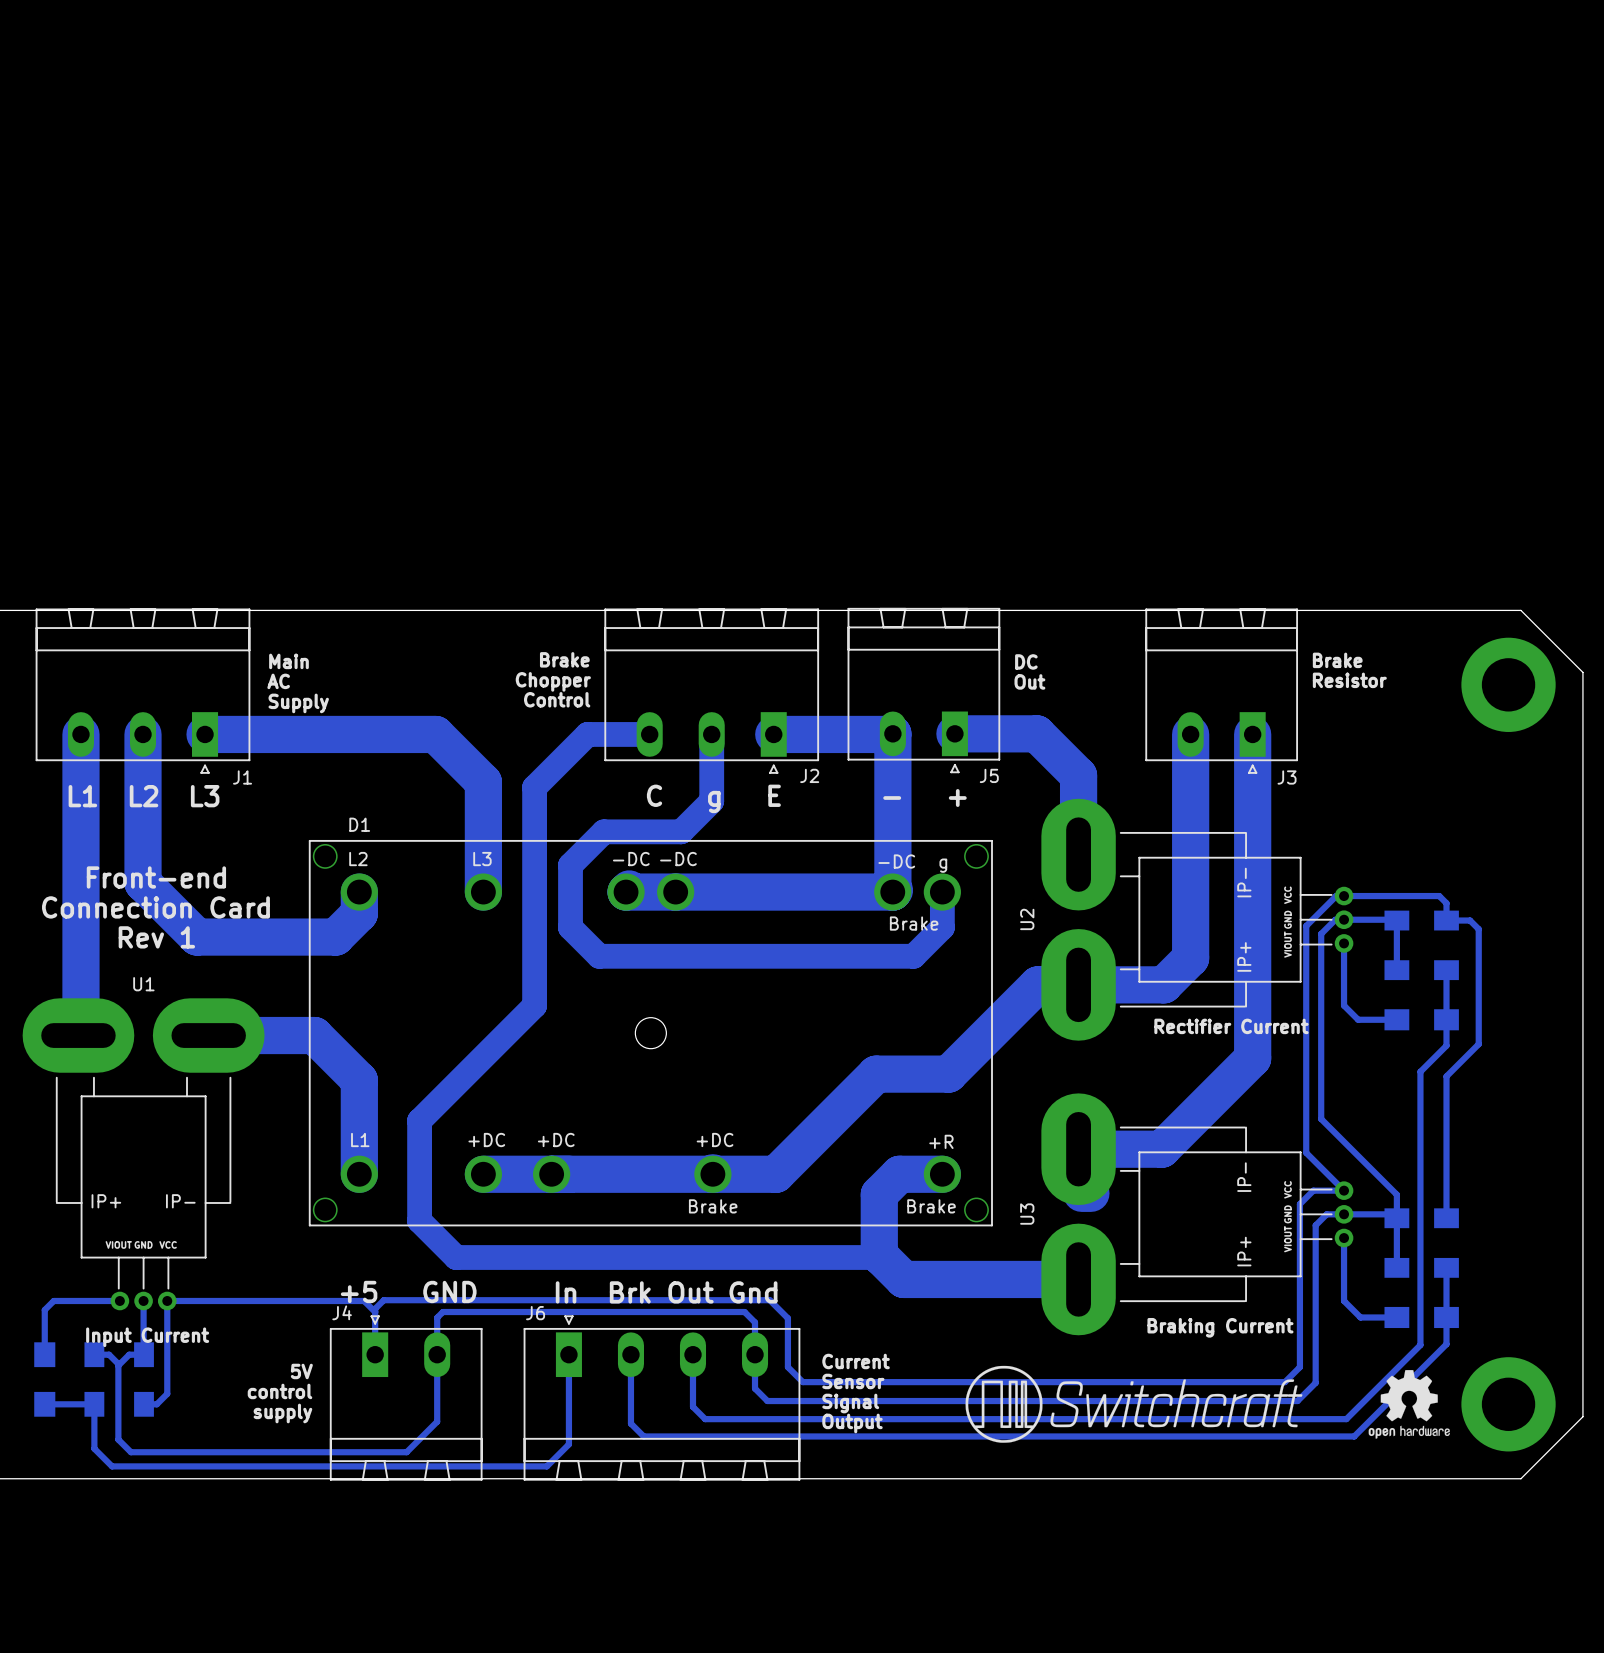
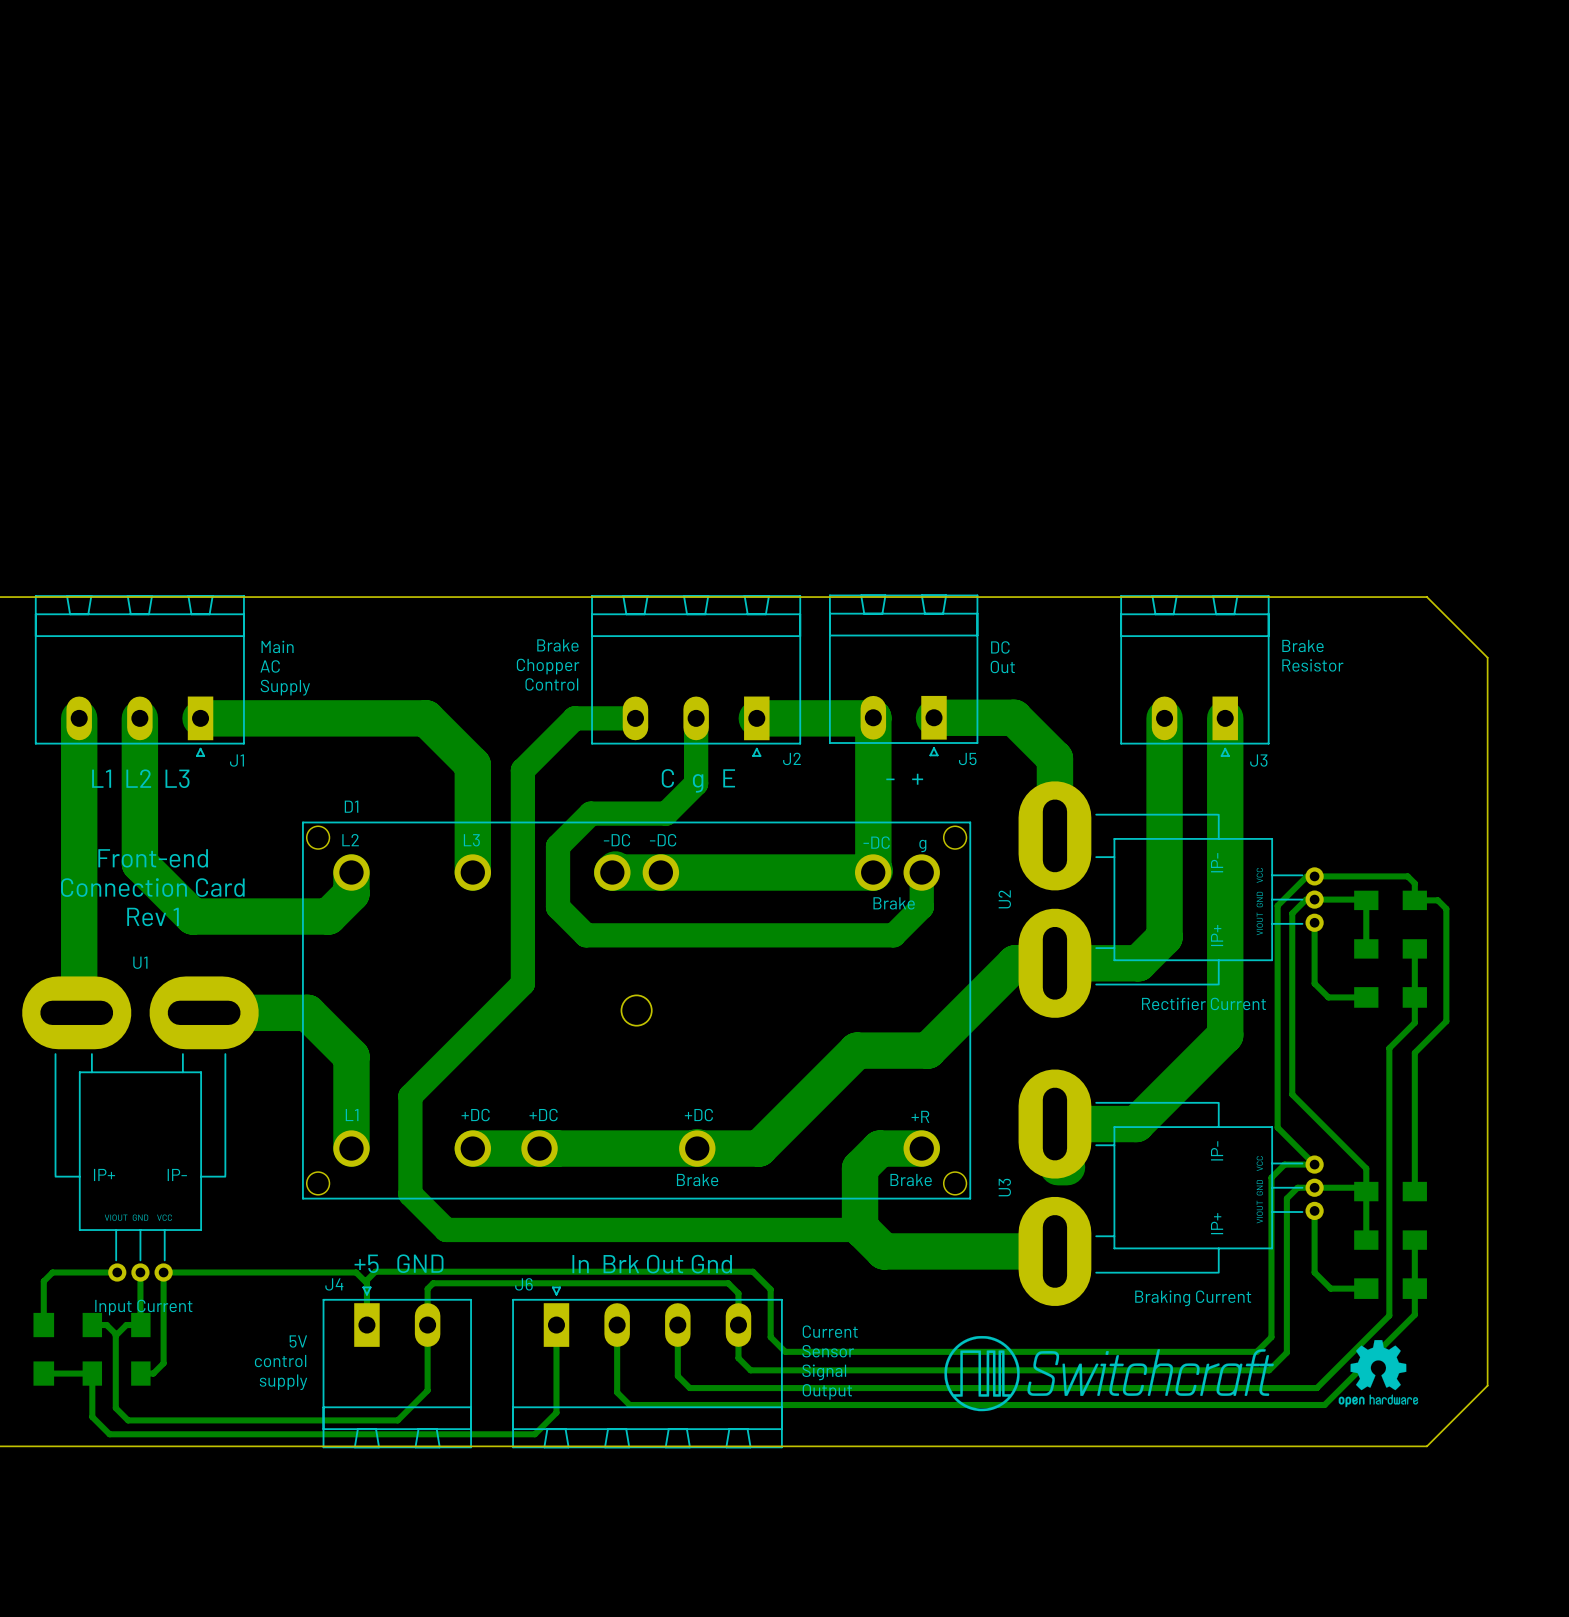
board edge: (1458, 610) (1520, 610) (1582, 672) (1582, 1416) (1520, 1478) (1458, 1478) -> (1426, 597) (1487, 657) (1487, 1385) (1426, 1446)
part: (1508, 684) -> none
part: (1508, 1404) -> none

